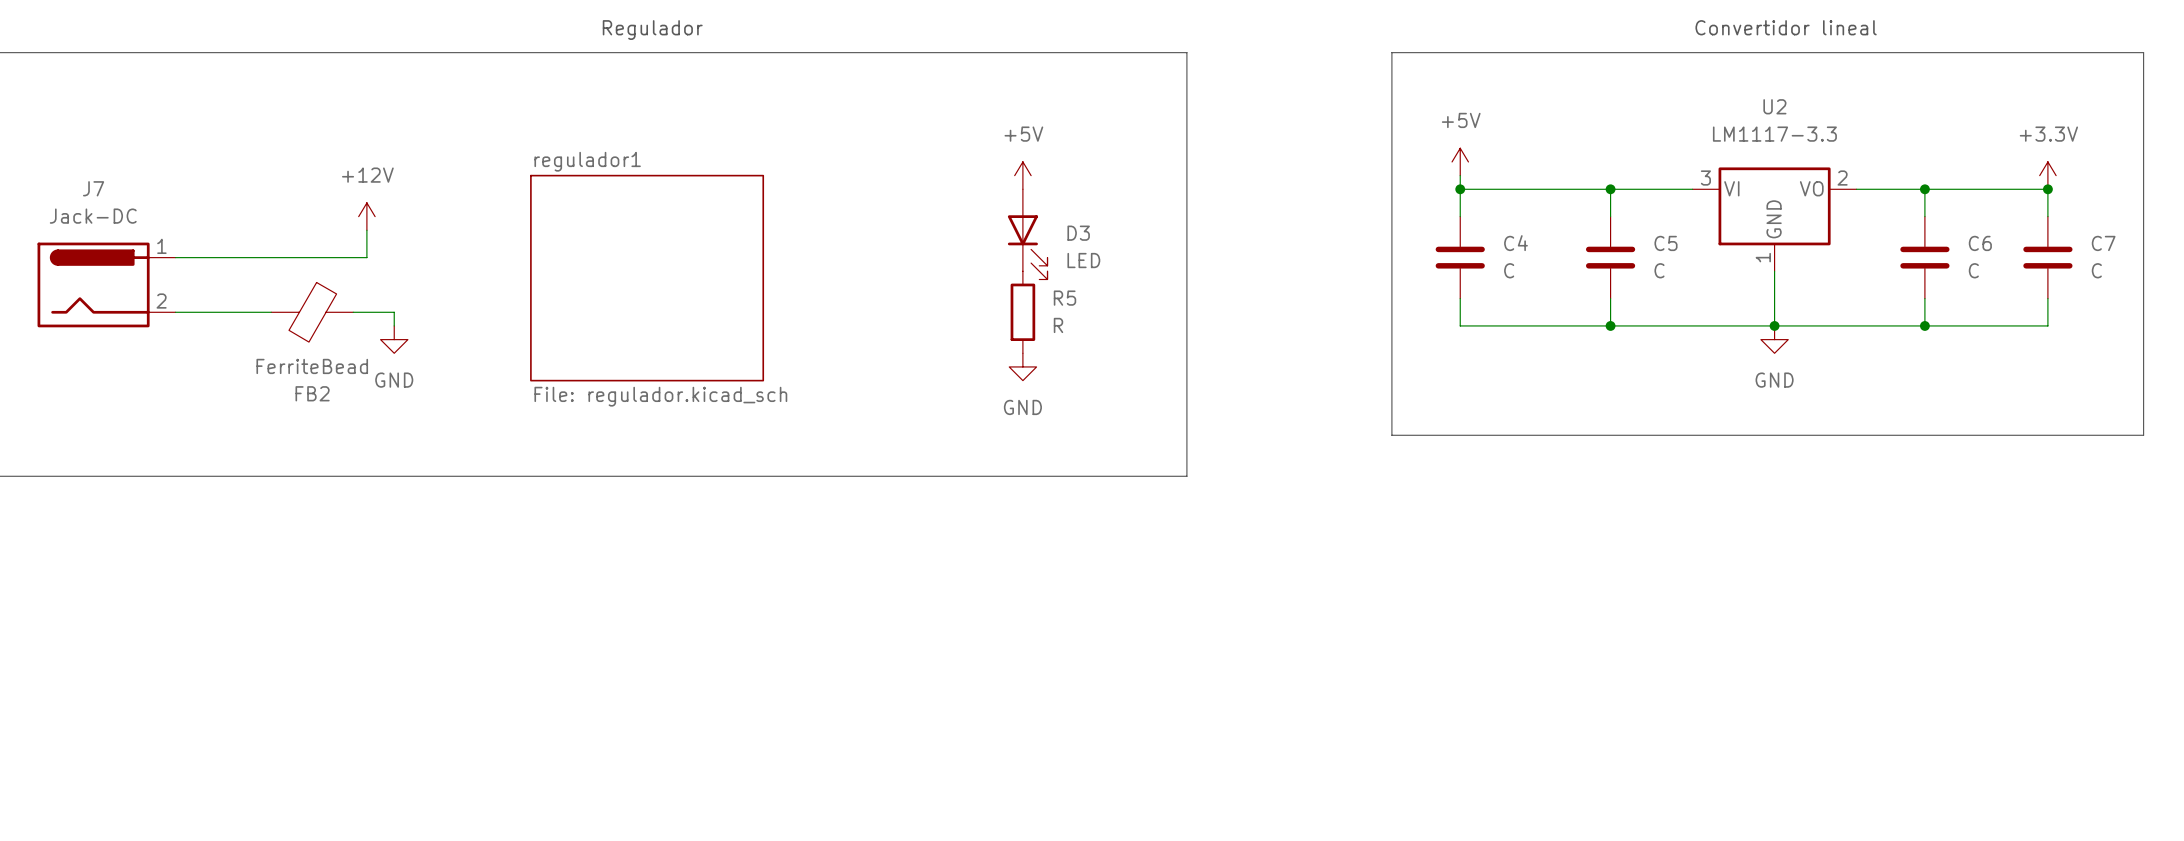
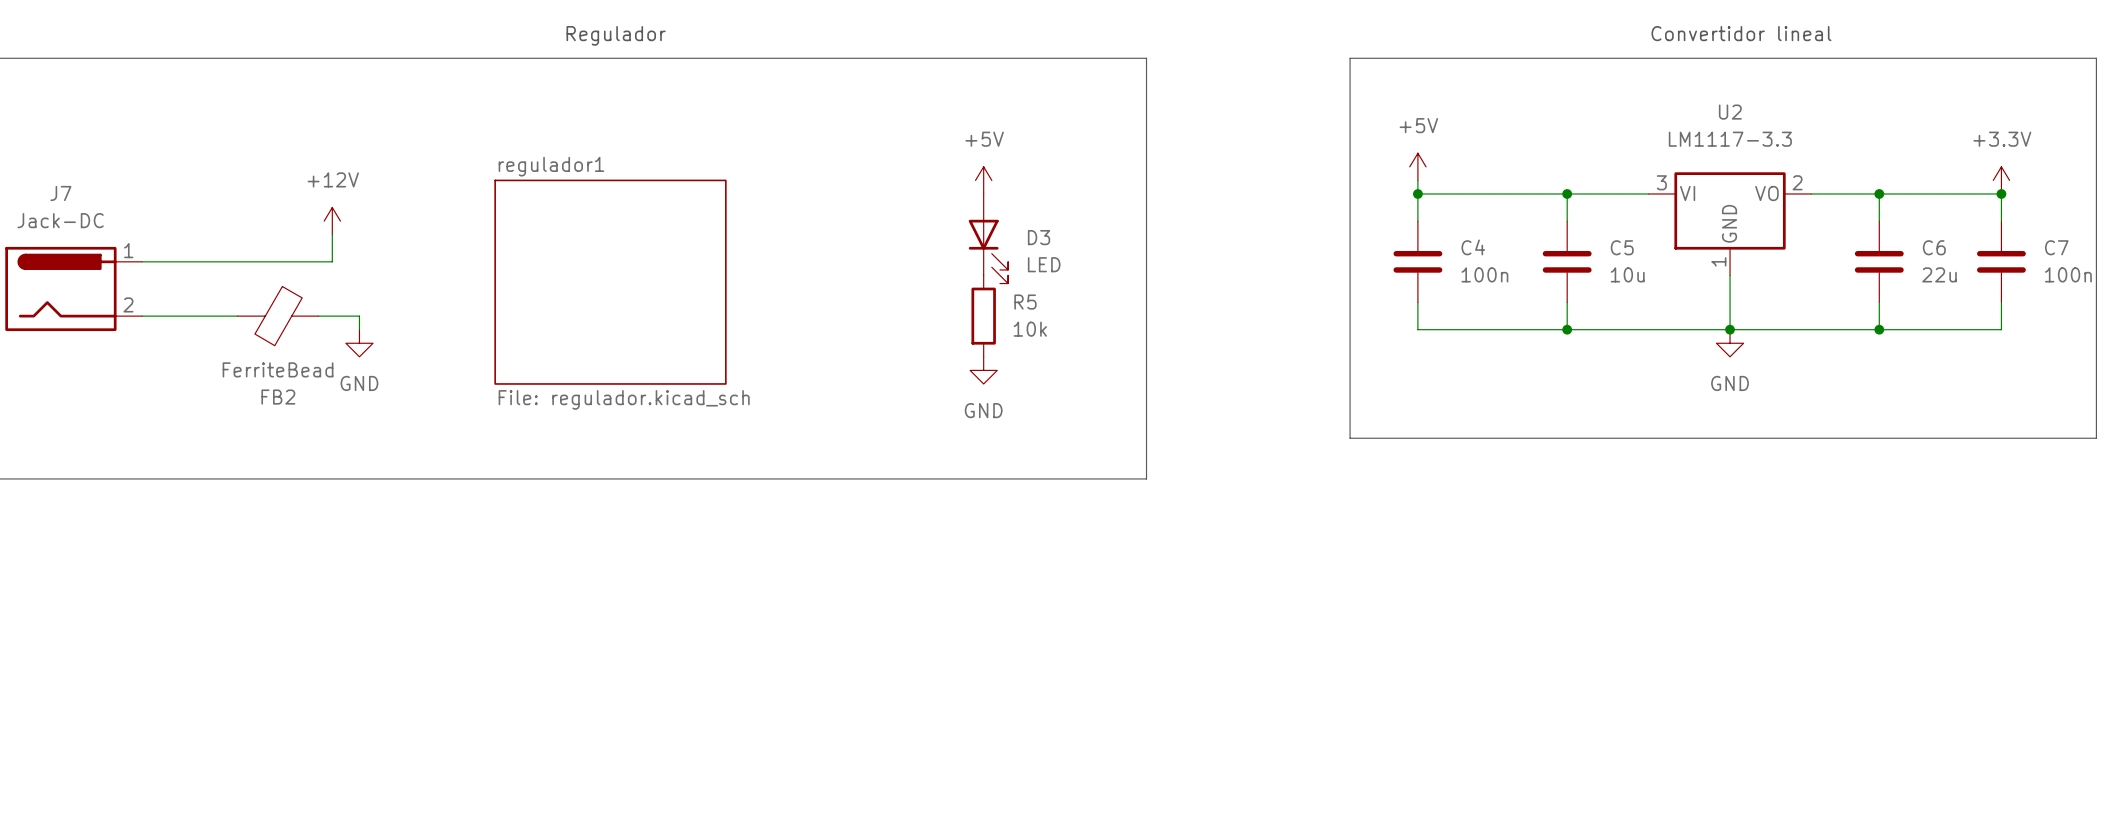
C4 value: C (1509, 270) -> 100n (1484, 274)
C5 value: C (1659, 270) -> 10u (1627, 274)
C6 value: C (1973, 270) -> 22u (1939, 274)
C7 value: C (2096, 270) -> 100n (2068, 274)
R5 value: R (1058, 325) -> 10k (1030, 329)

